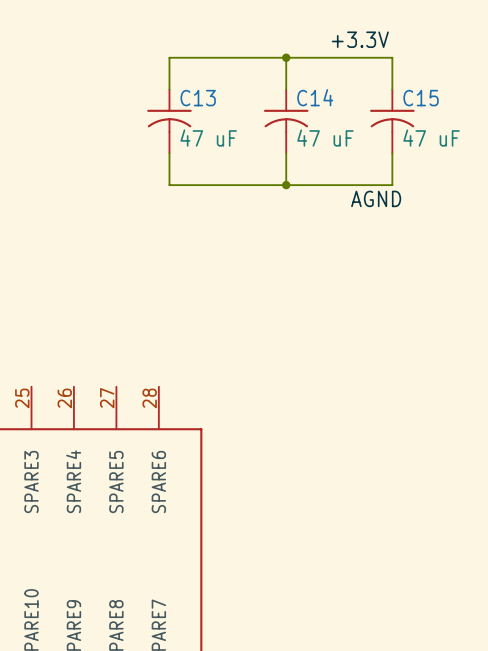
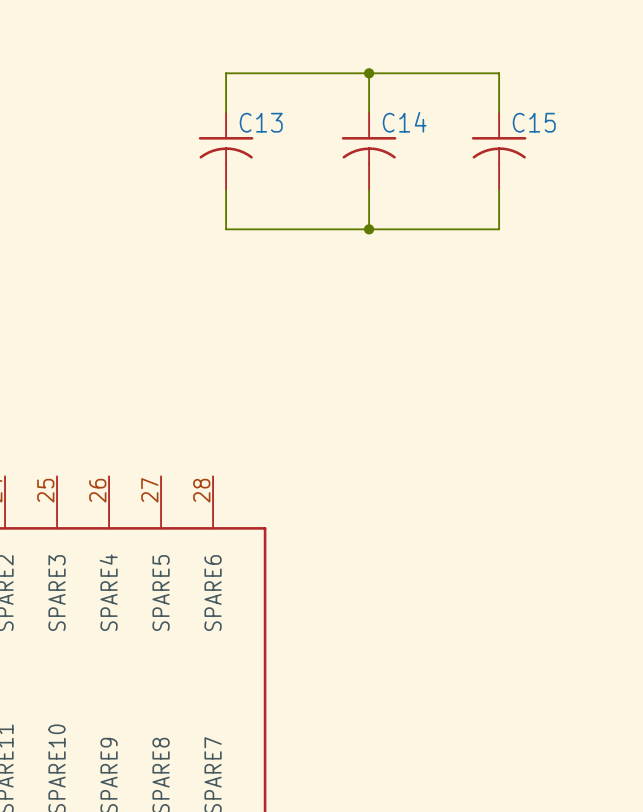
label: +3.3V (360, 39) -> none
C13 value: 47 uF (208, 138) -> none
C14 value: 47 uF (325, 138) -> none
C15 value: 47 uF (431, 138) -> none
label: AGND (376, 198) -> none

